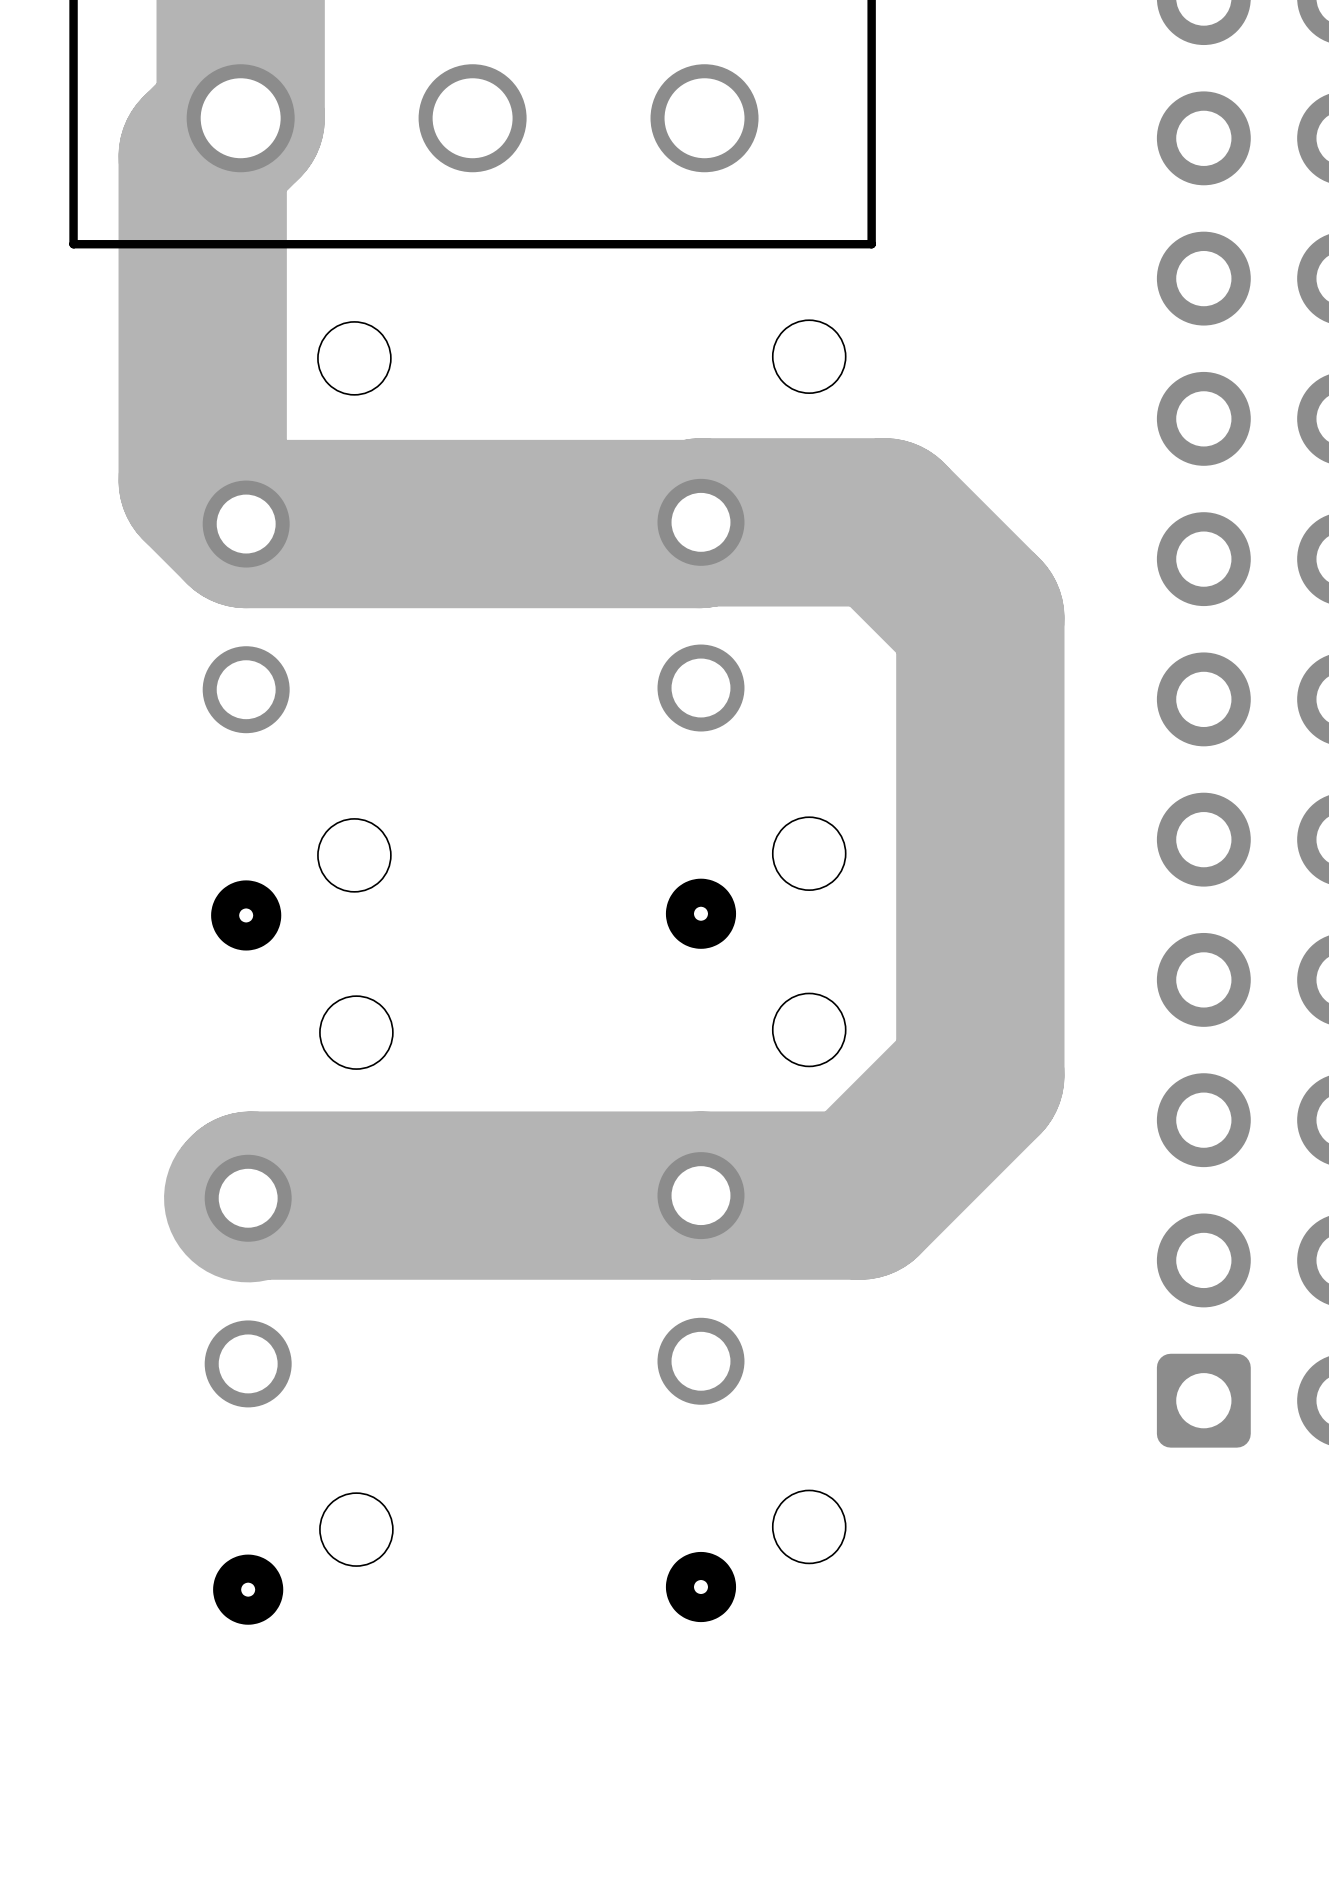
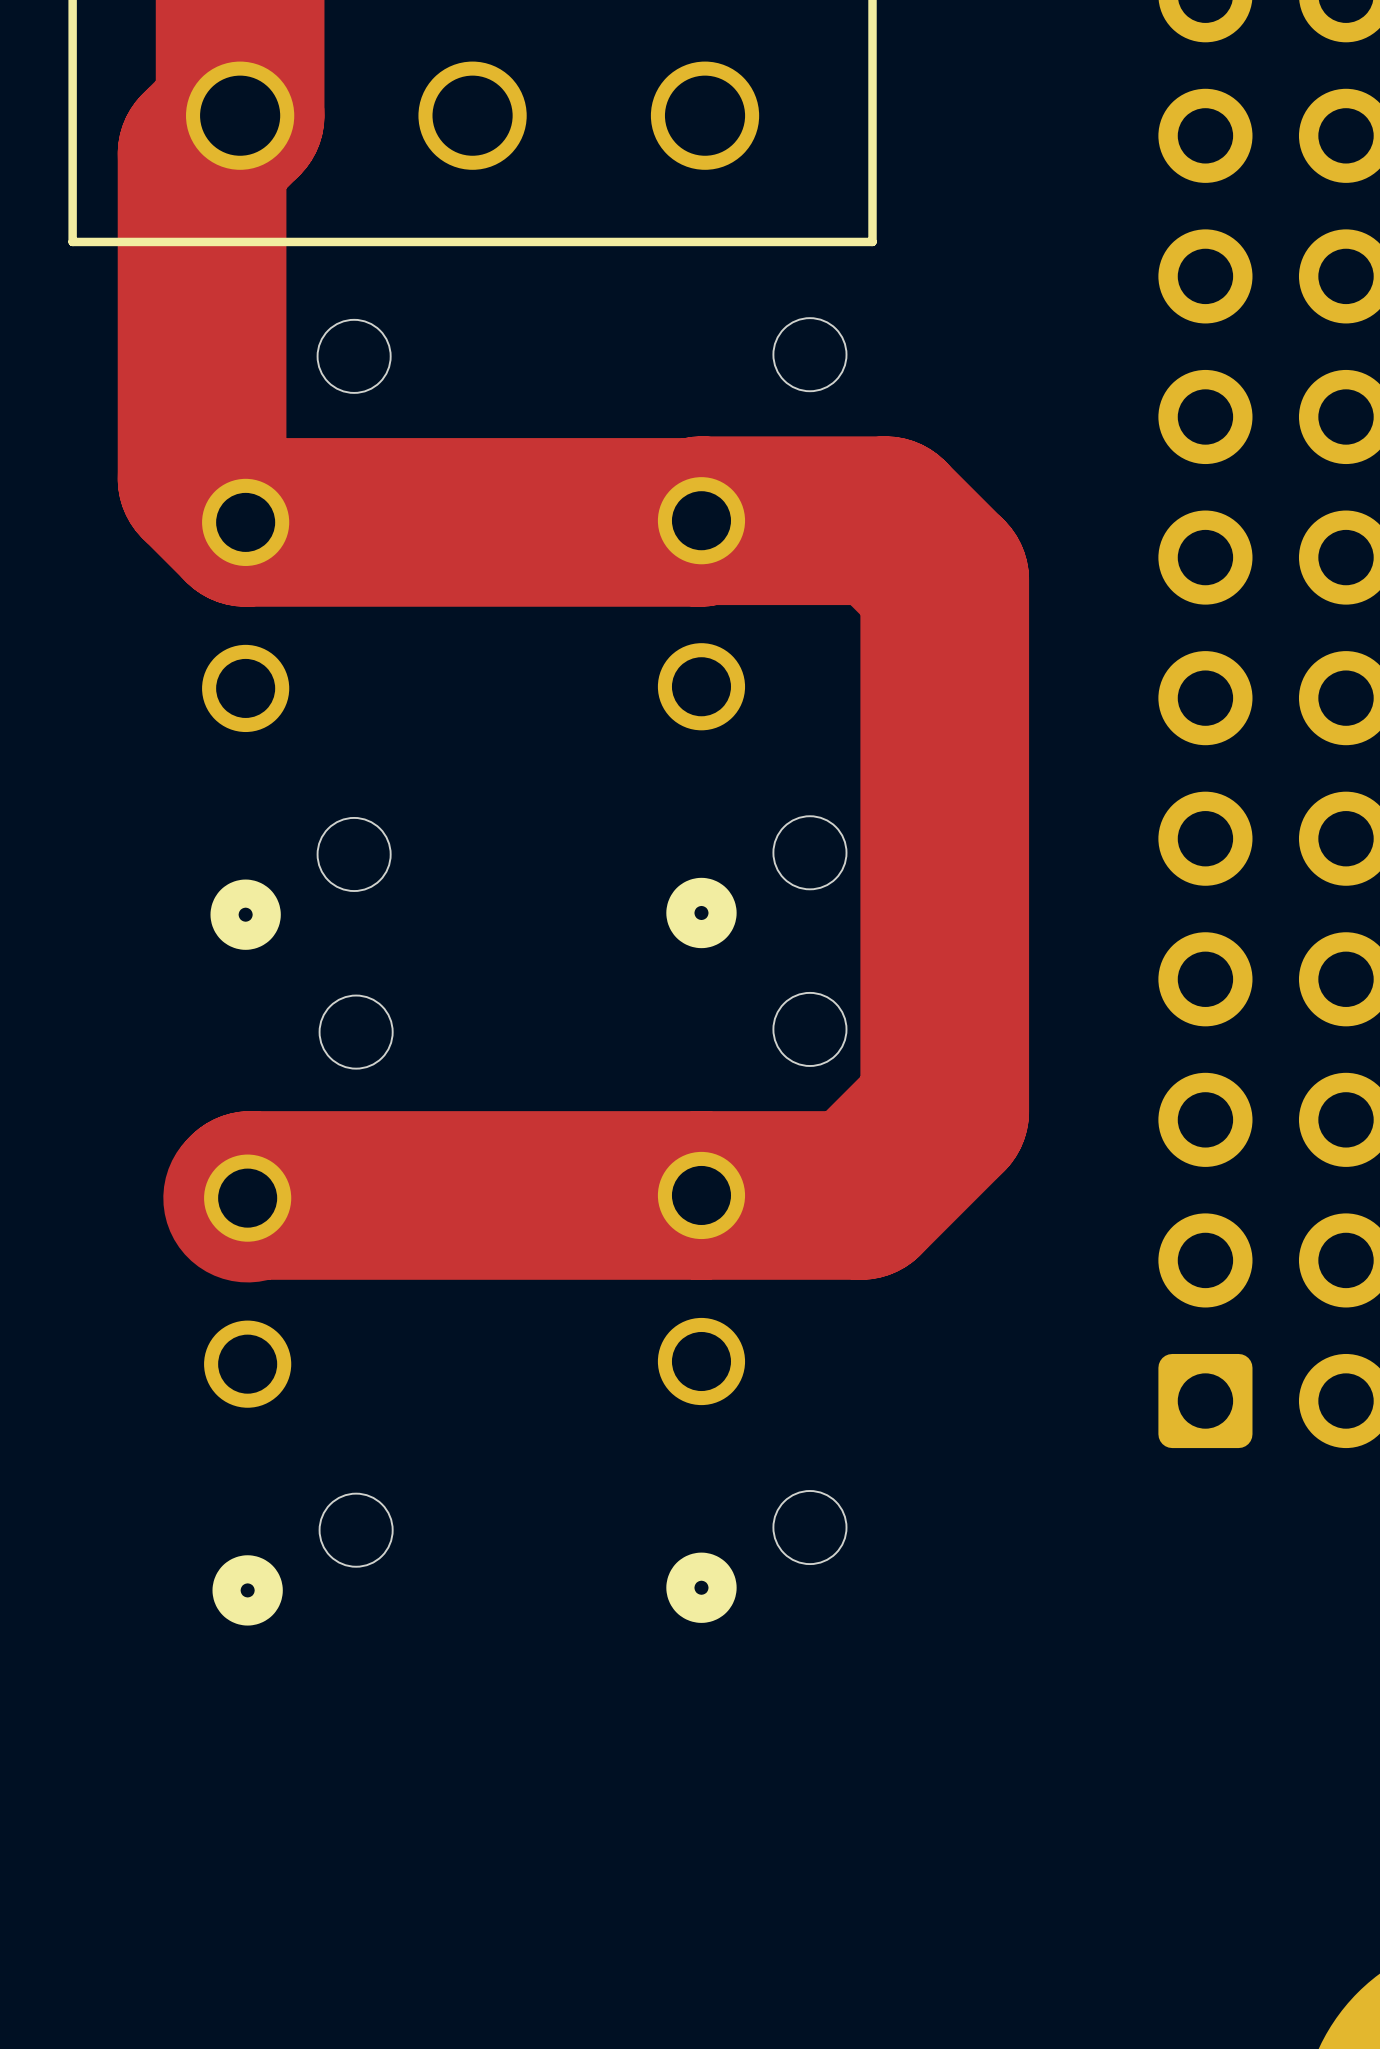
track: (943, 581) (980, 618) (980, 1075) (943, 1111) -> (944, 579) (944, 1111)

